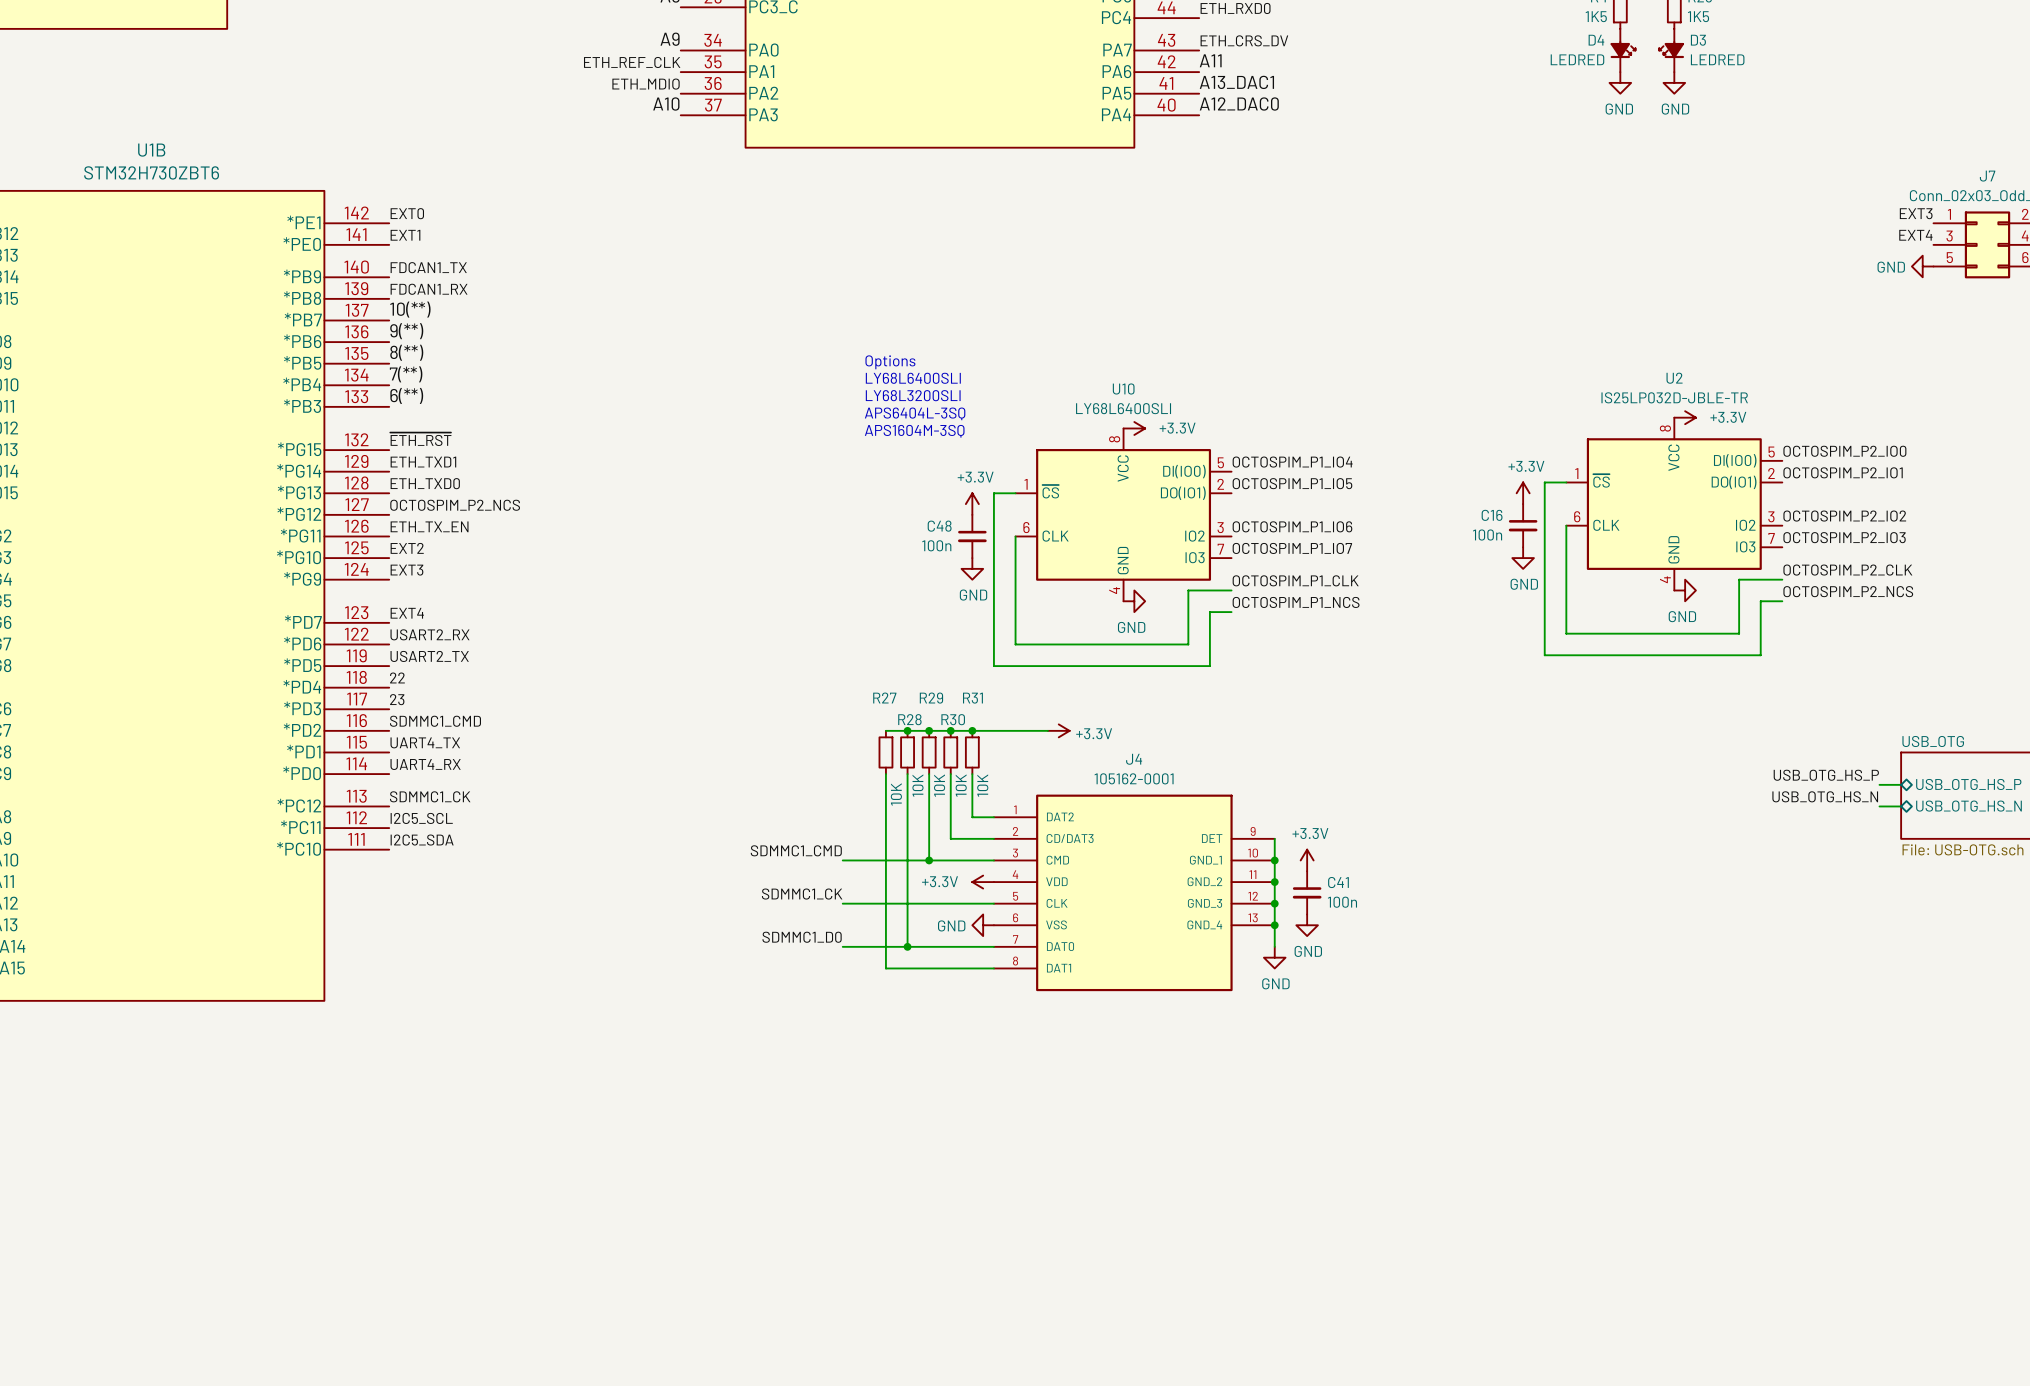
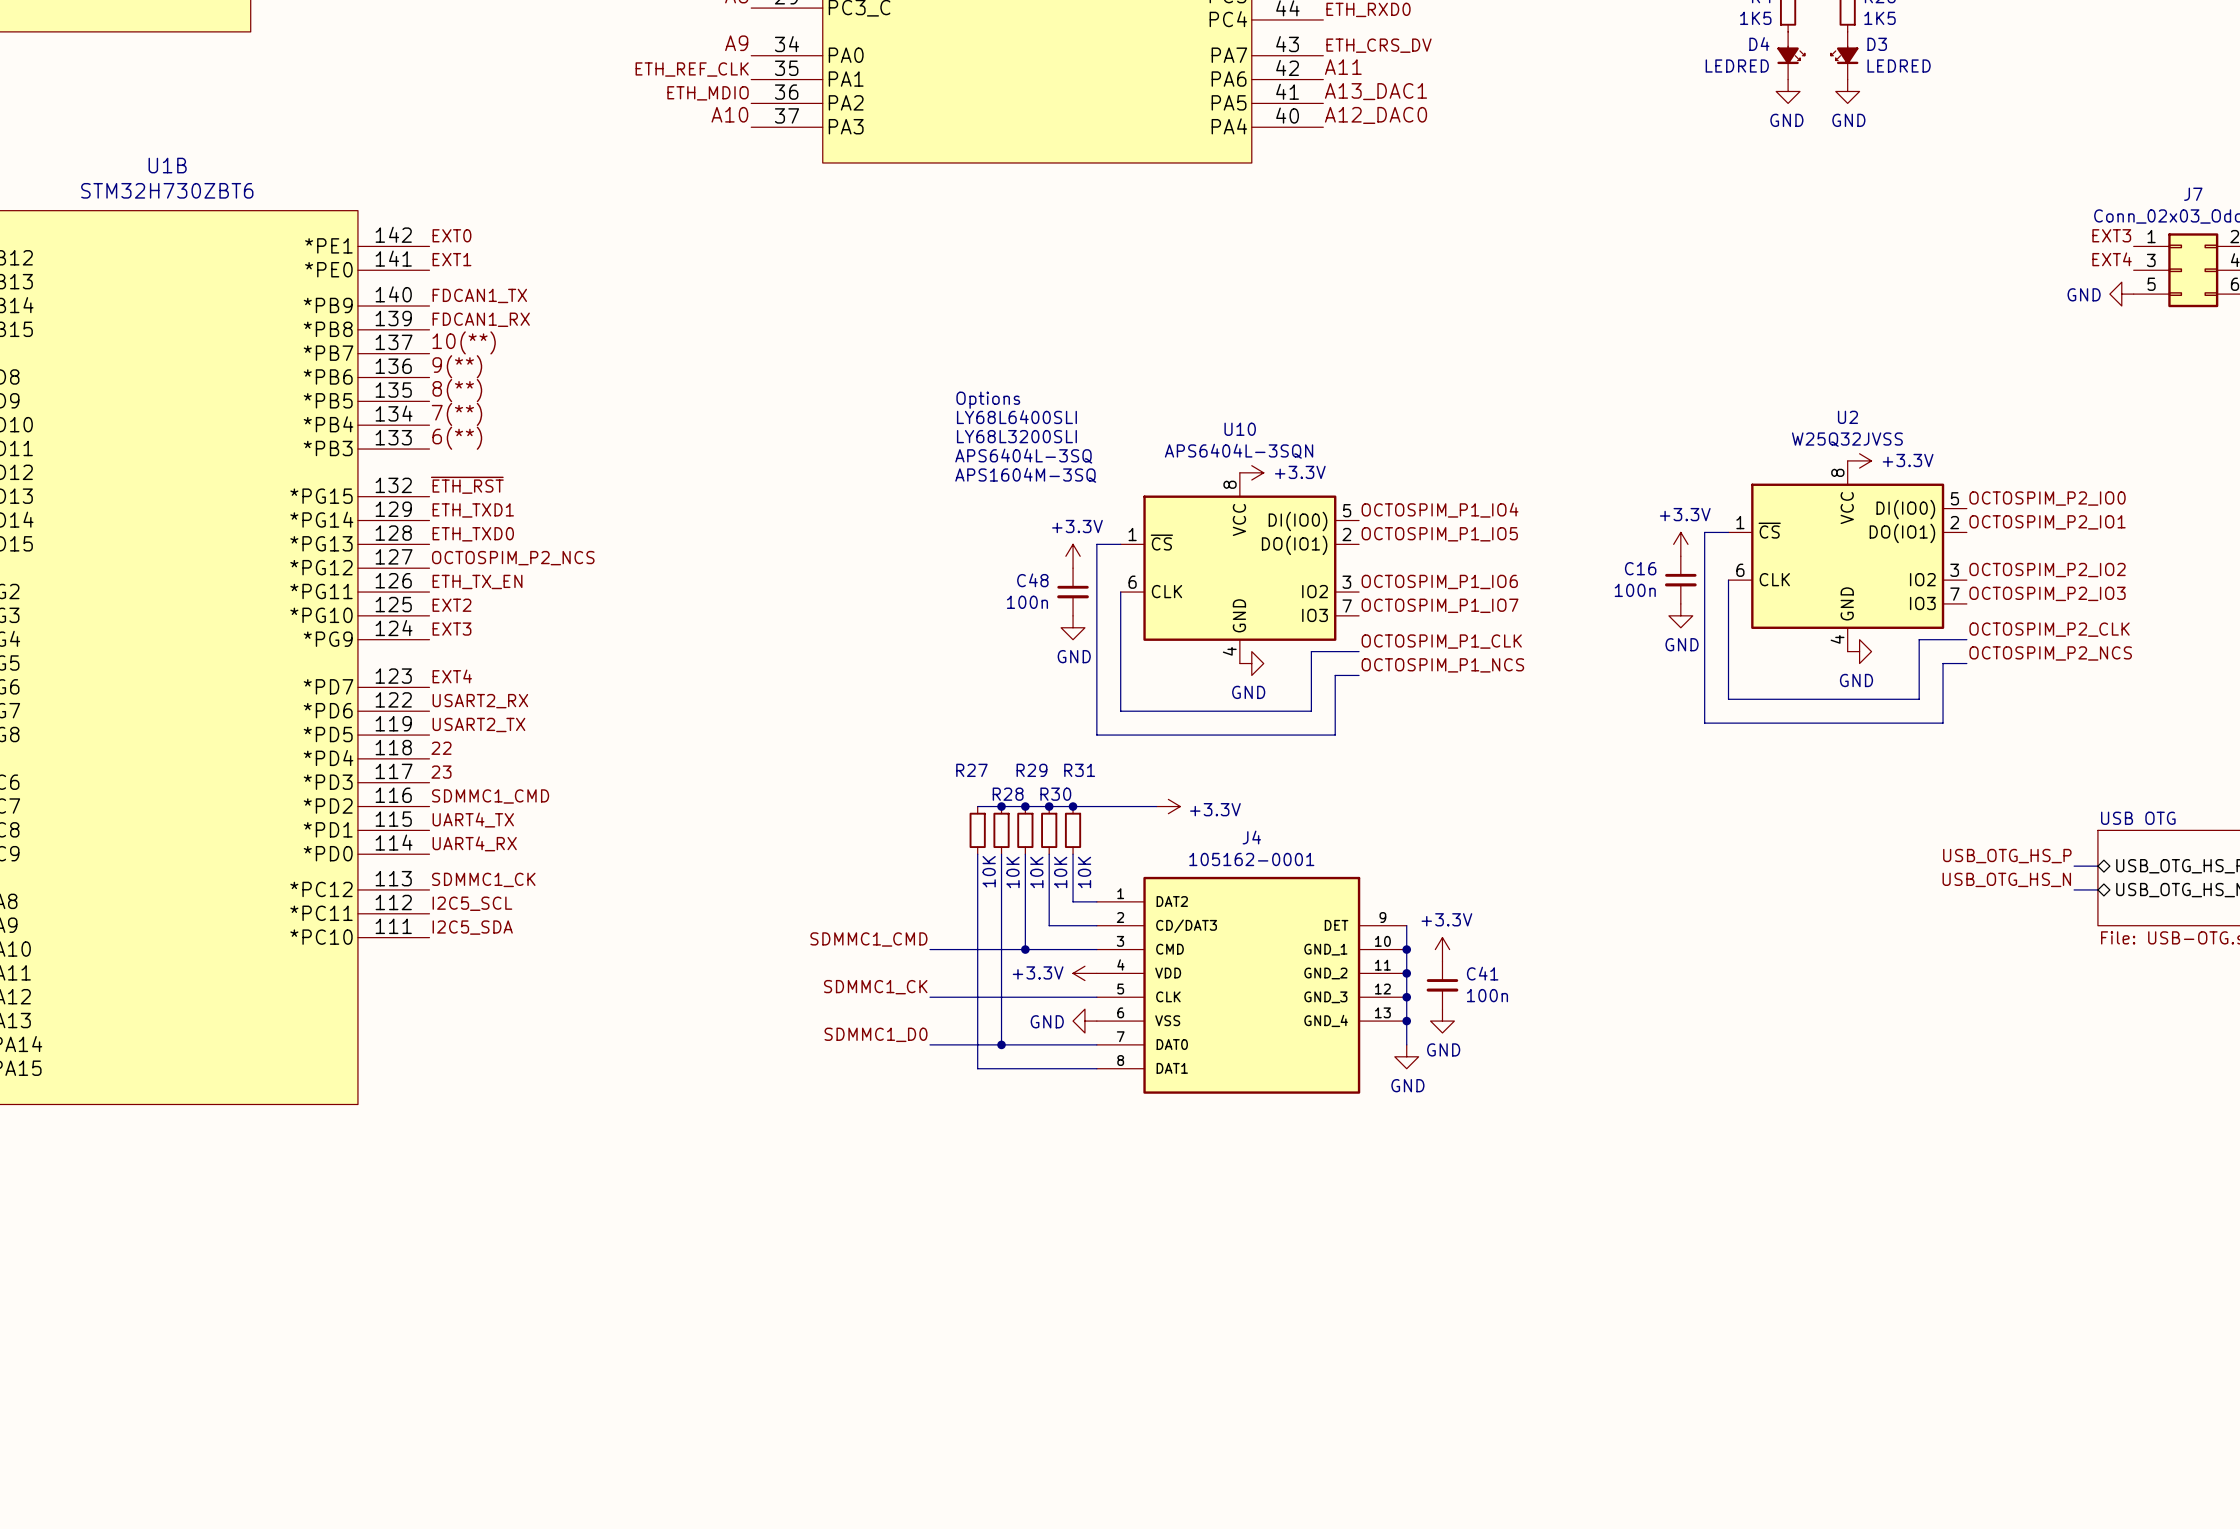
U2 value: IS25LP032D-JBLE-TR (1674, 397) -> W25Q32JVSS (1847, 439)
U10 value: LY68L6400SLI (1123, 408) -> APS6404L-3SQN (1239, 451)
sheet USB_OTG name: USB_OTG (1933, 741) -> USB OTG (2138, 818)

